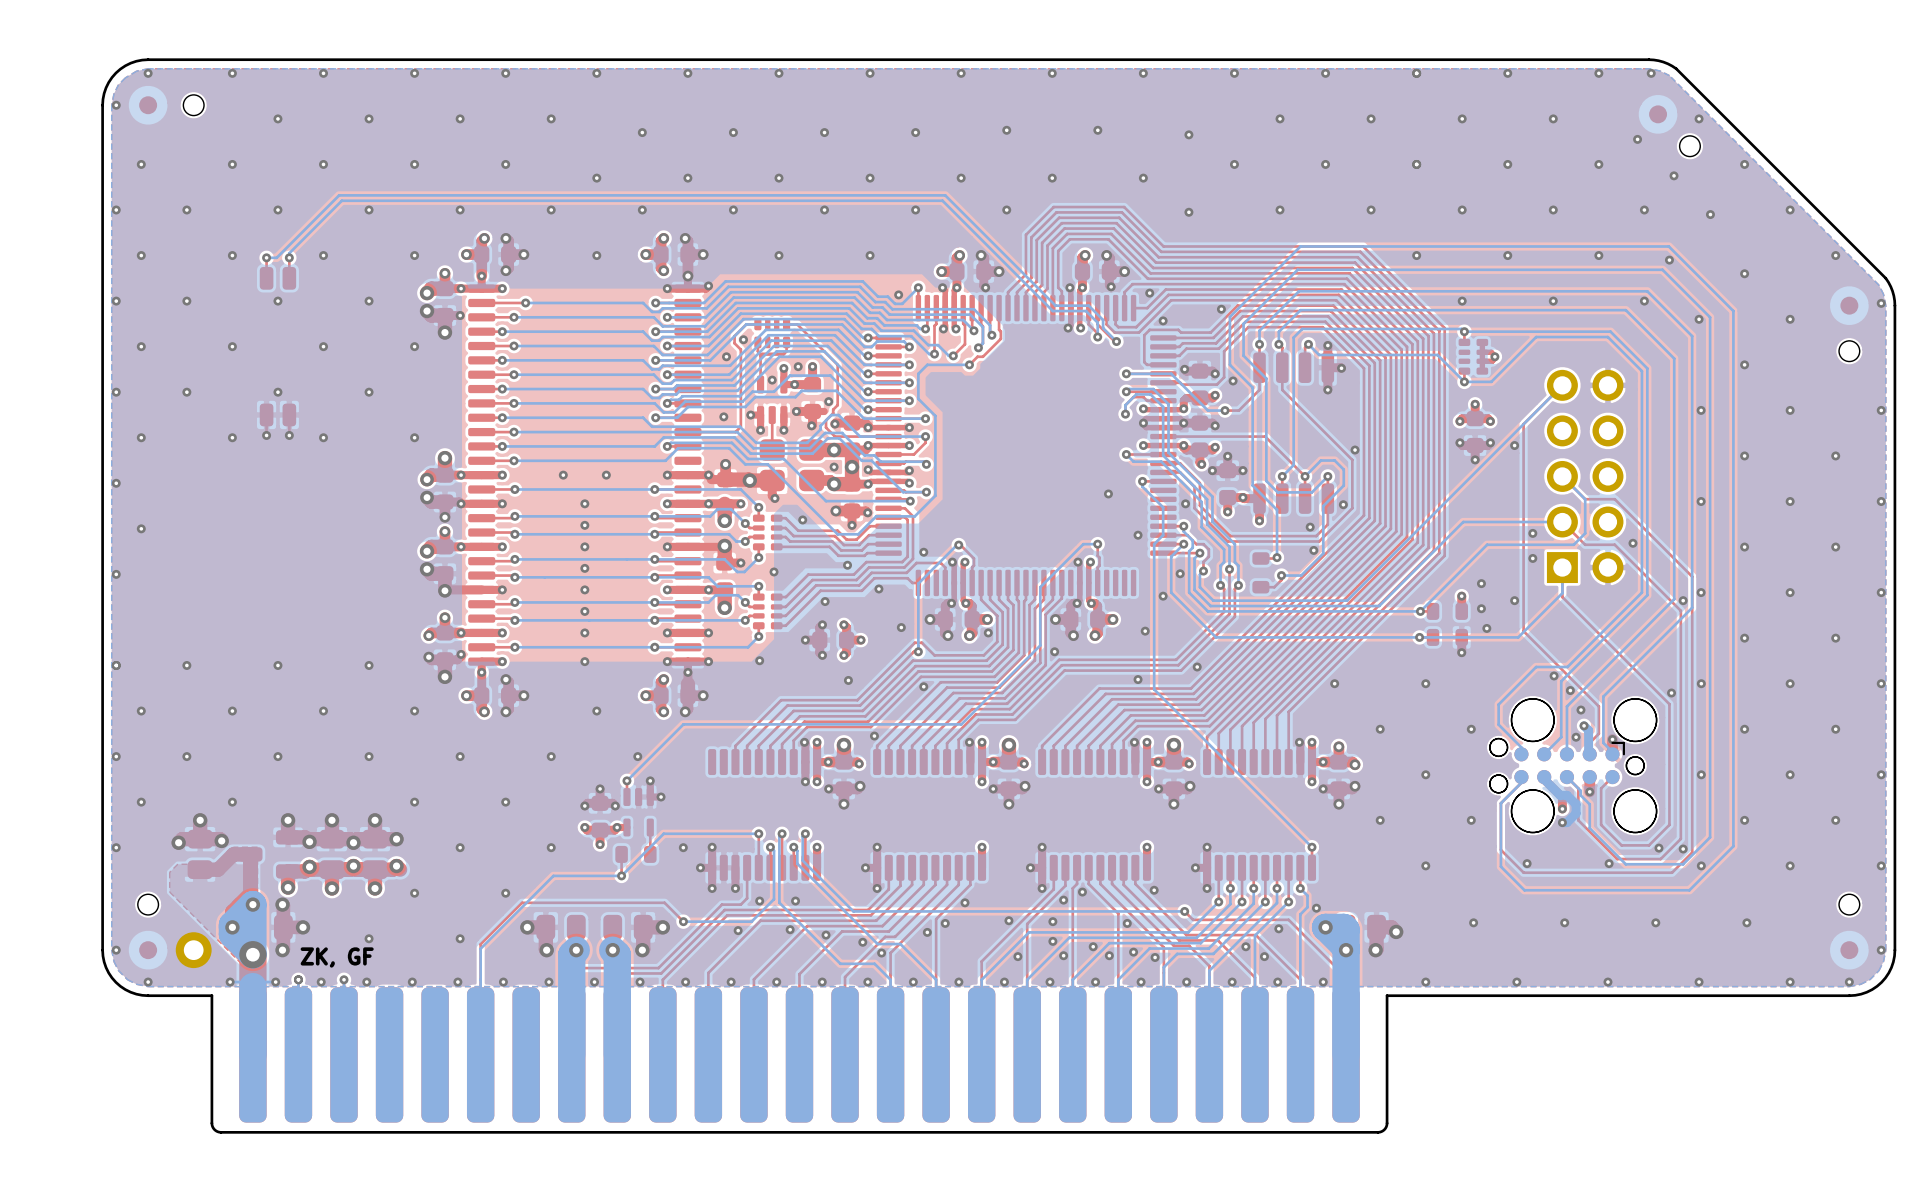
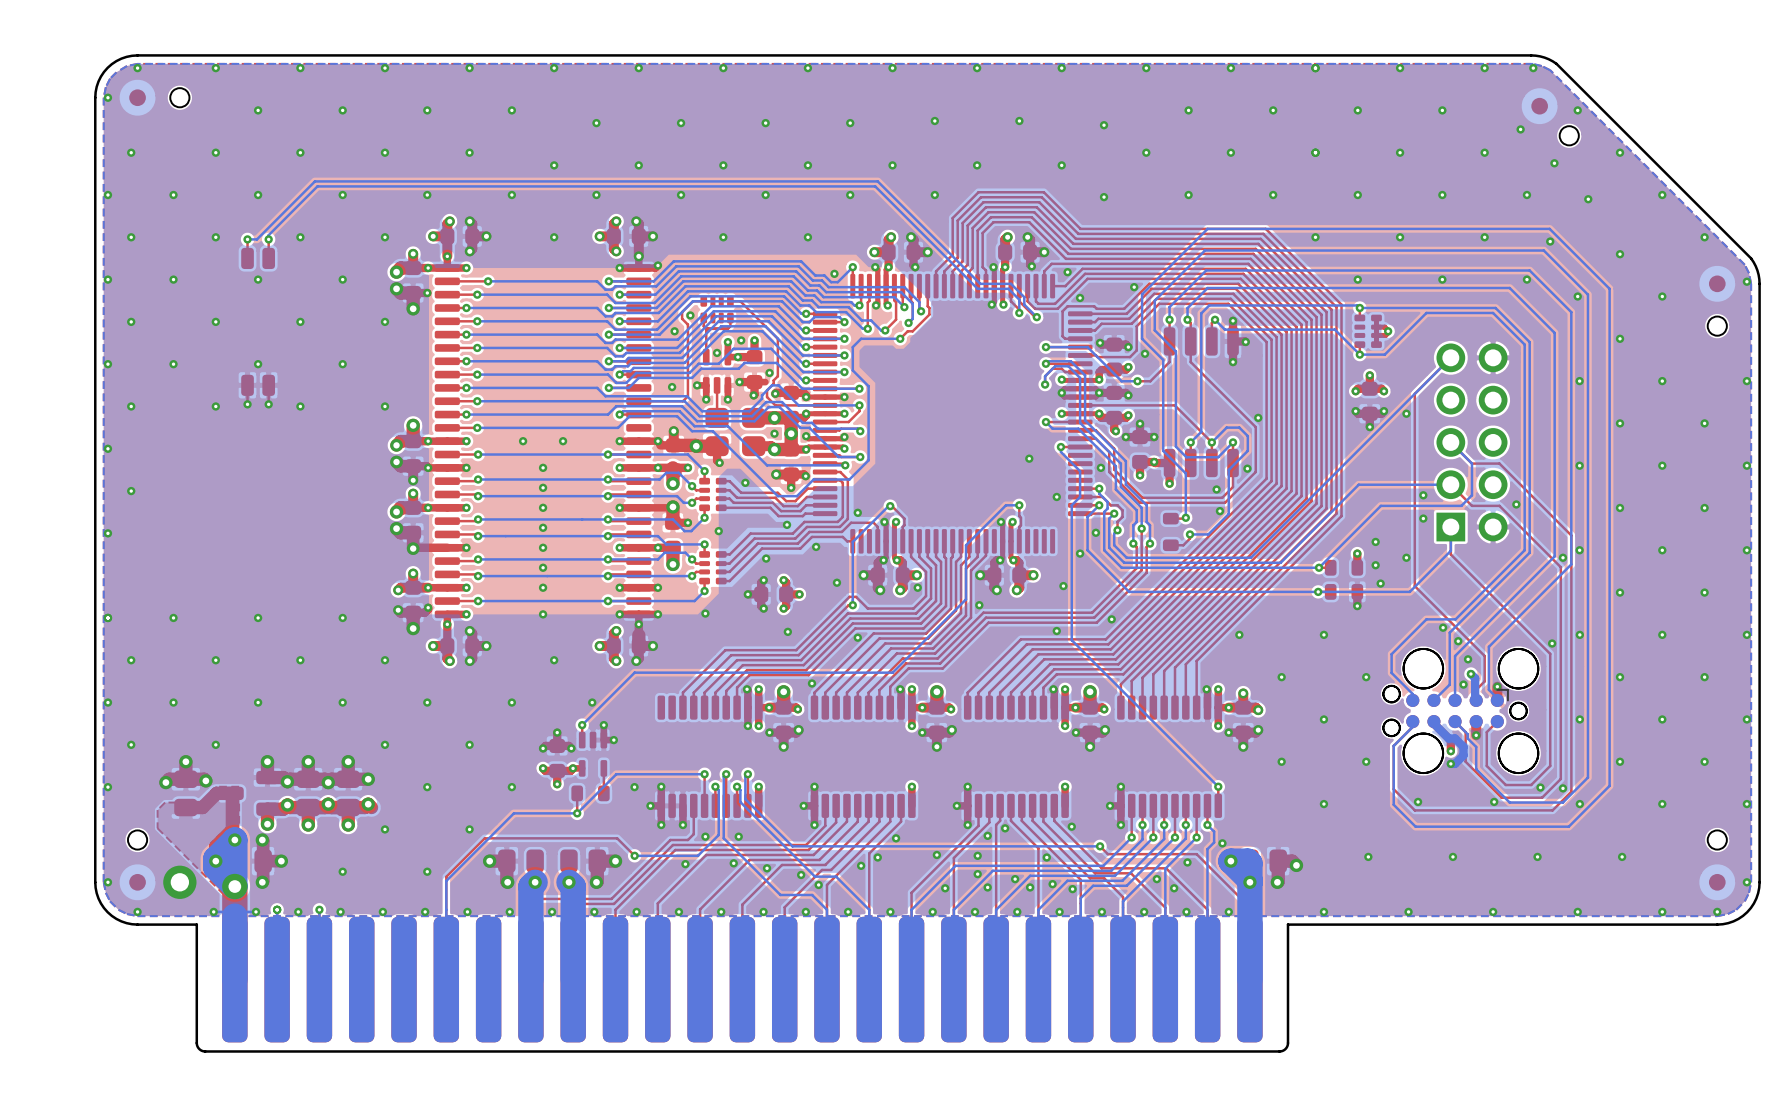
text: ZK, GF (337, 957) -> none

